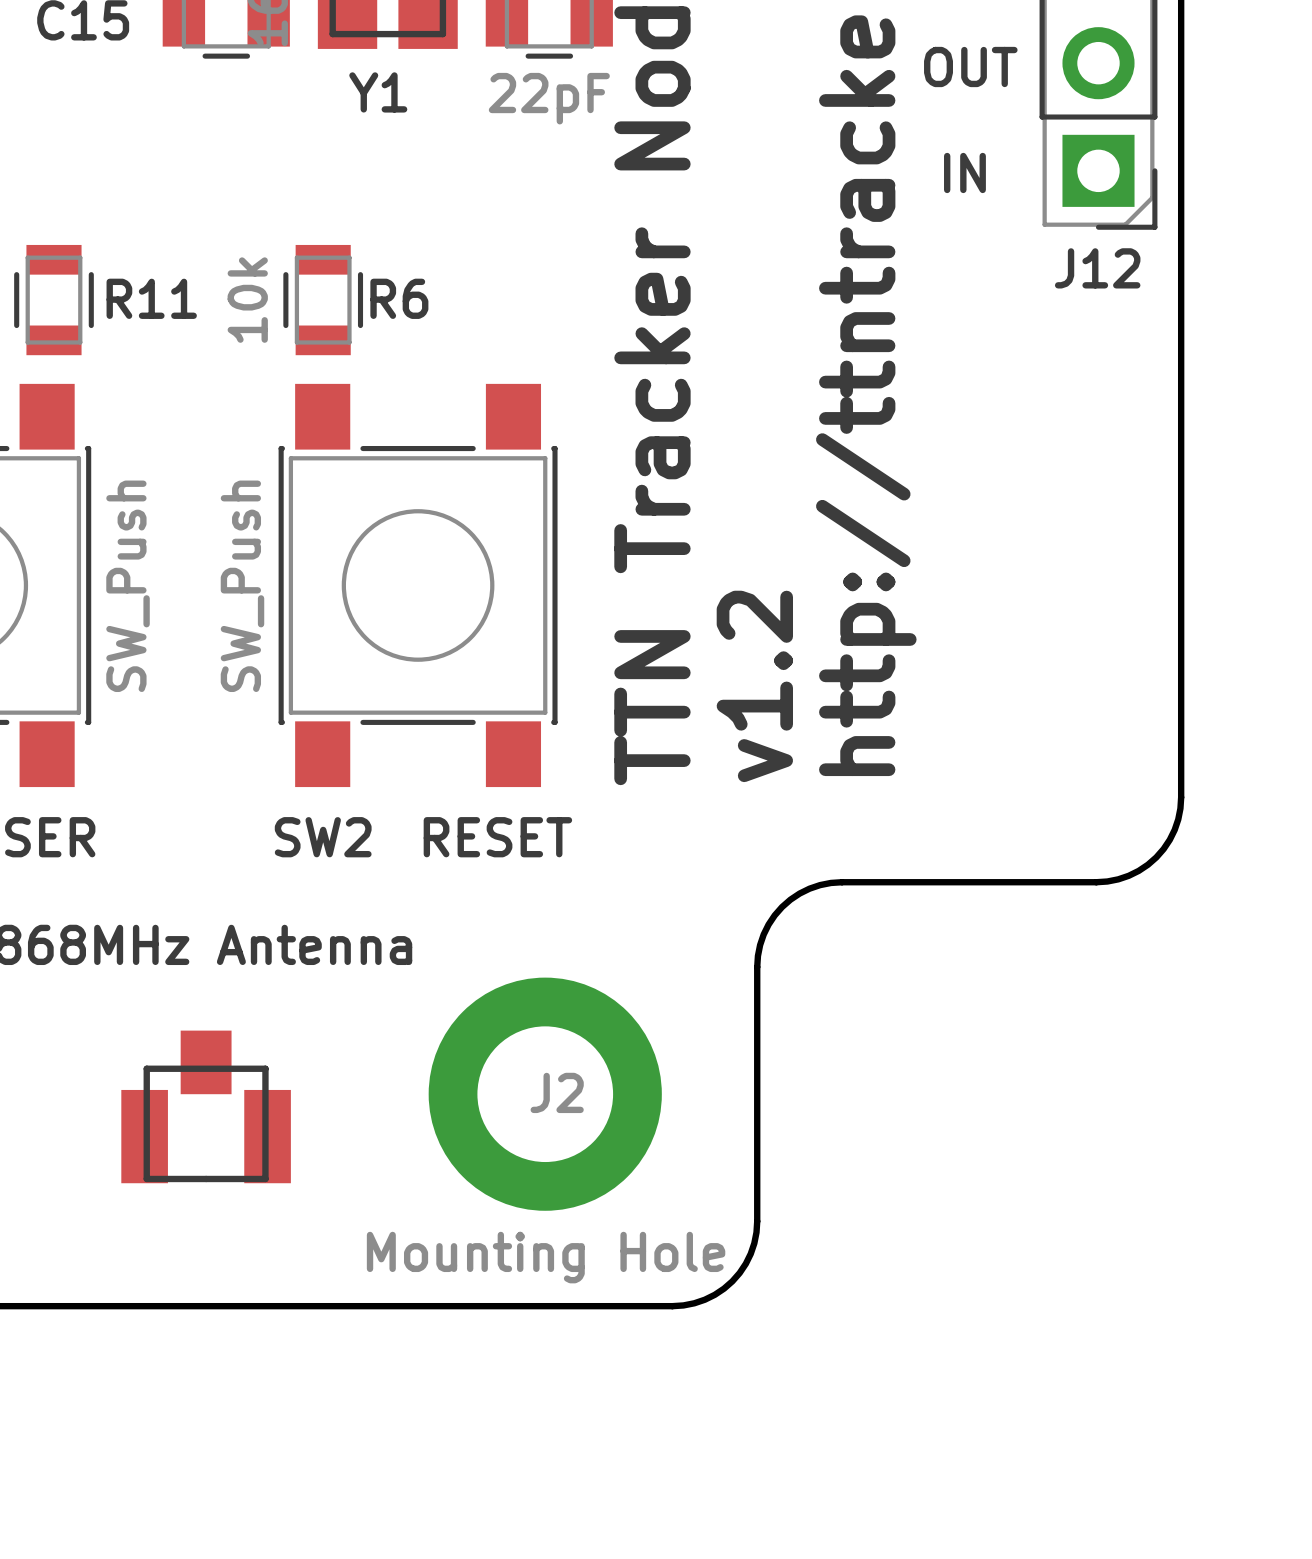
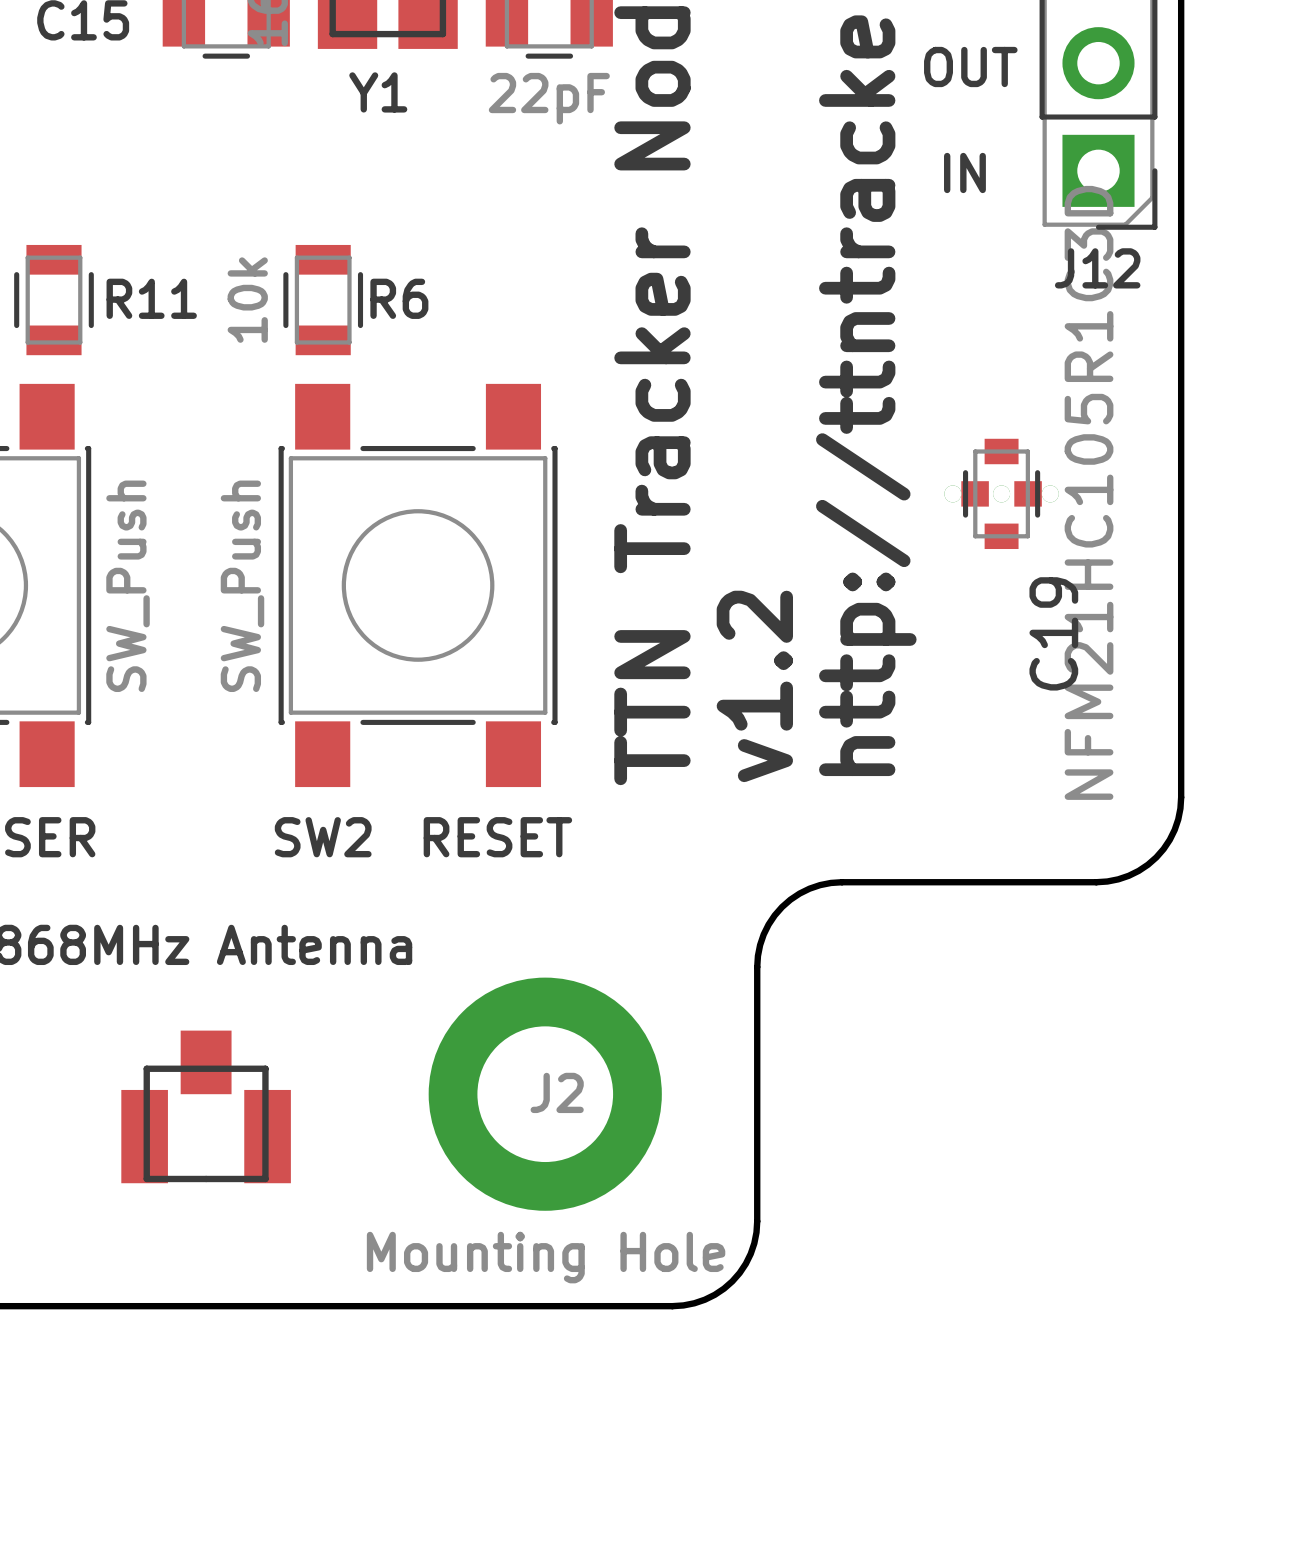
C19: none -> NFM21HC105R1C3D (1001, 493)

